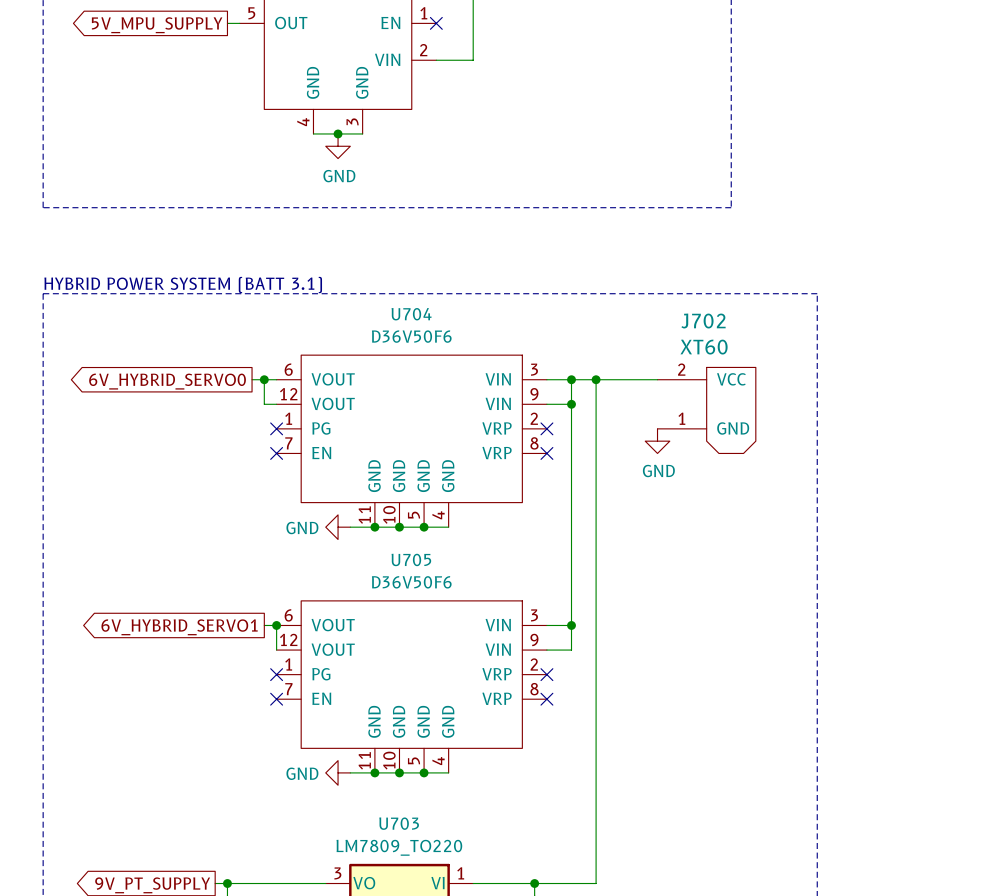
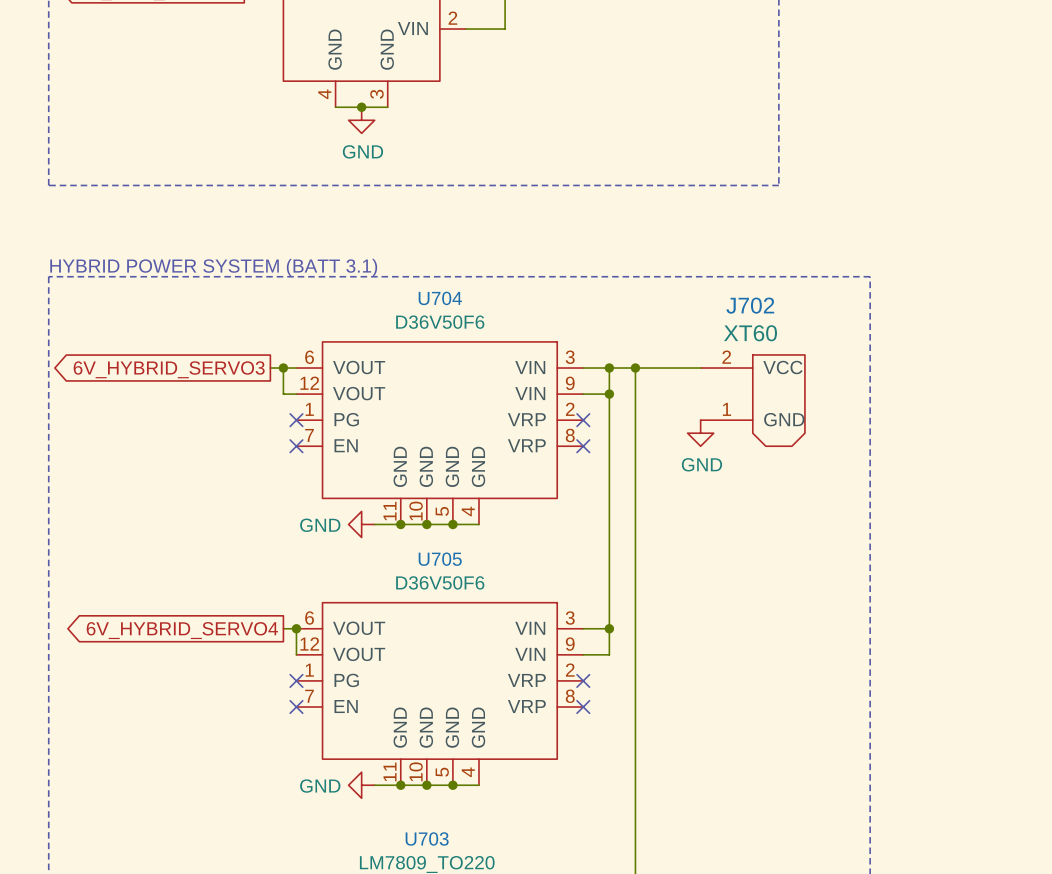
global label: 6V_HYBRID_SERVO0 (167, 381) -> 6V_HYBRID_SERVO3 (169, 369)
global label: 6V_HYBRID_SERVO1 (179, 627) -> 6V_HYBRID_SERVO4 (182, 630)

